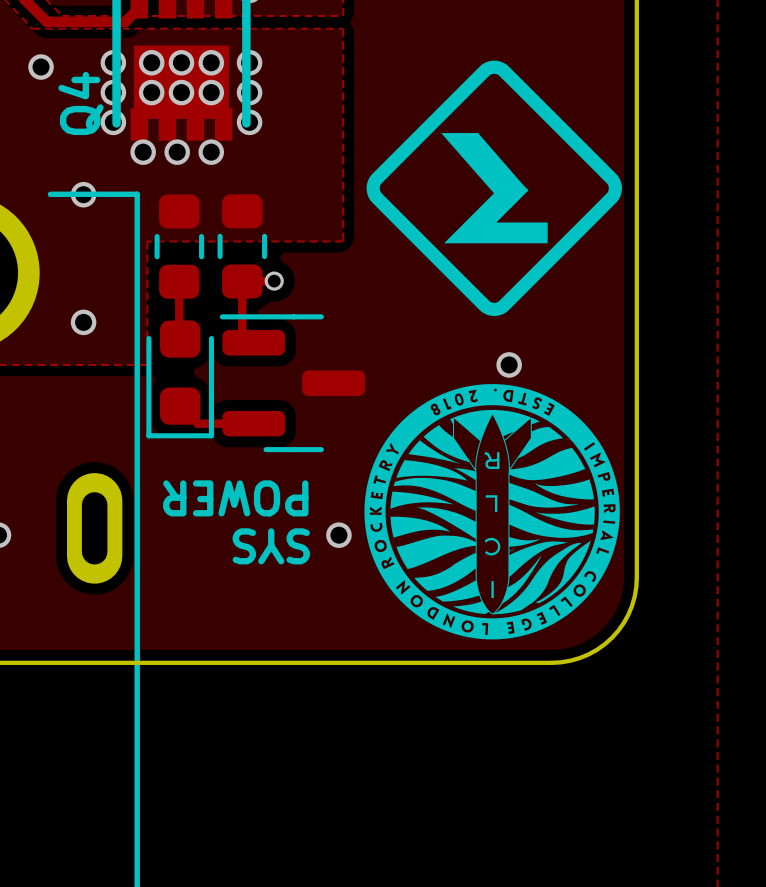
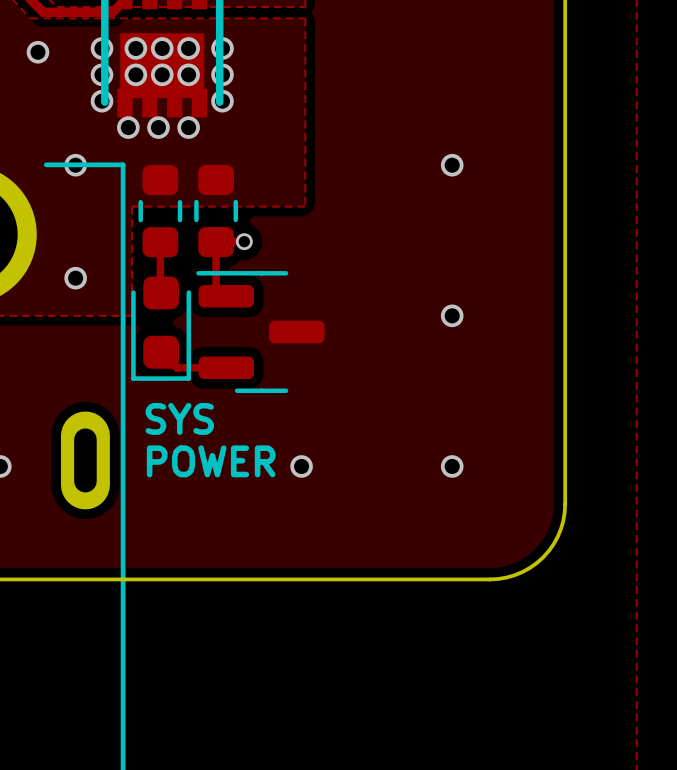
drawing: [366, 60, 622, 316] -> none
Q4 name: Q4 (81, 103) -> none
via: none -> (452, 165)
drawing: [364, 384, 620, 640] -> none
text rotation: 0° (235, 498) -> 180° (211, 461)
via: none -> (452, 466)
text rotation: 0° (271, 546) -> 180° (179, 418)

